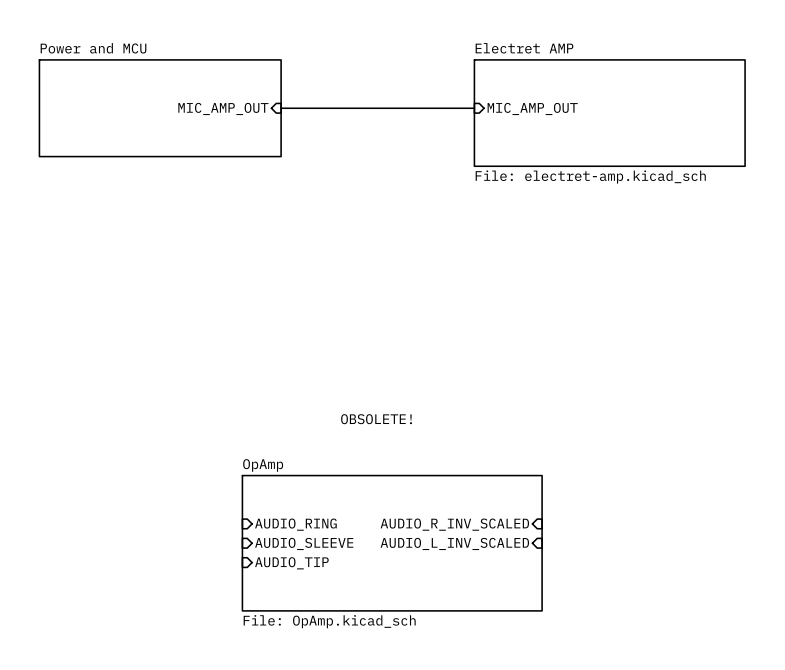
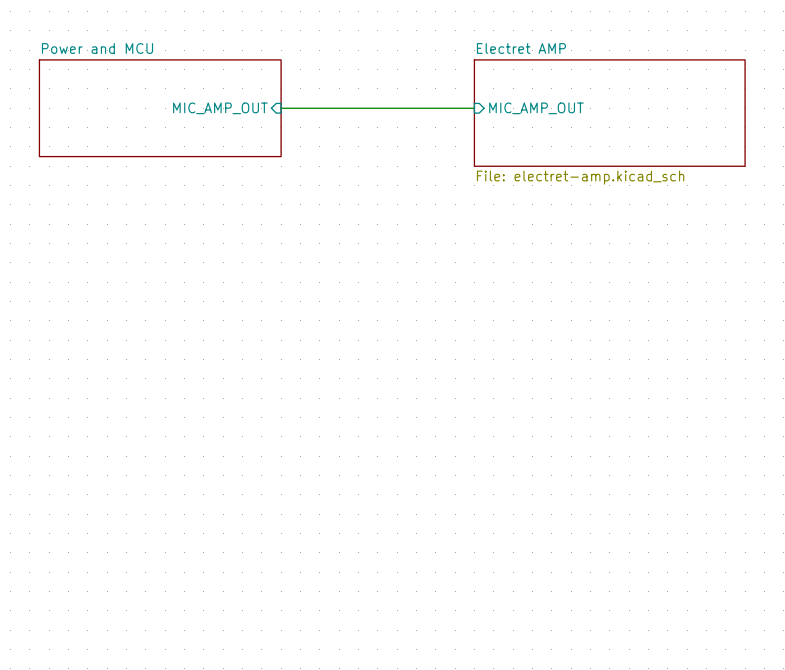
text: OBSOLETE! (376, 419) -> none
sheet pin: AUDIO_RING (295, 524) -> none
sheet pin: AUDIO_R_INV_SCALED (454, 524) -> none
sheet pin: AUDIO_SLEEVE (304, 543) -> none
sheet OpAmp: File: OpAmp.kicad_sch (392, 543) -> none
sheet pin: AUDIO_L_INV_SCALED (454, 543) -> none
sheet pin: AUDIO_TIP (291, 563) -> none

